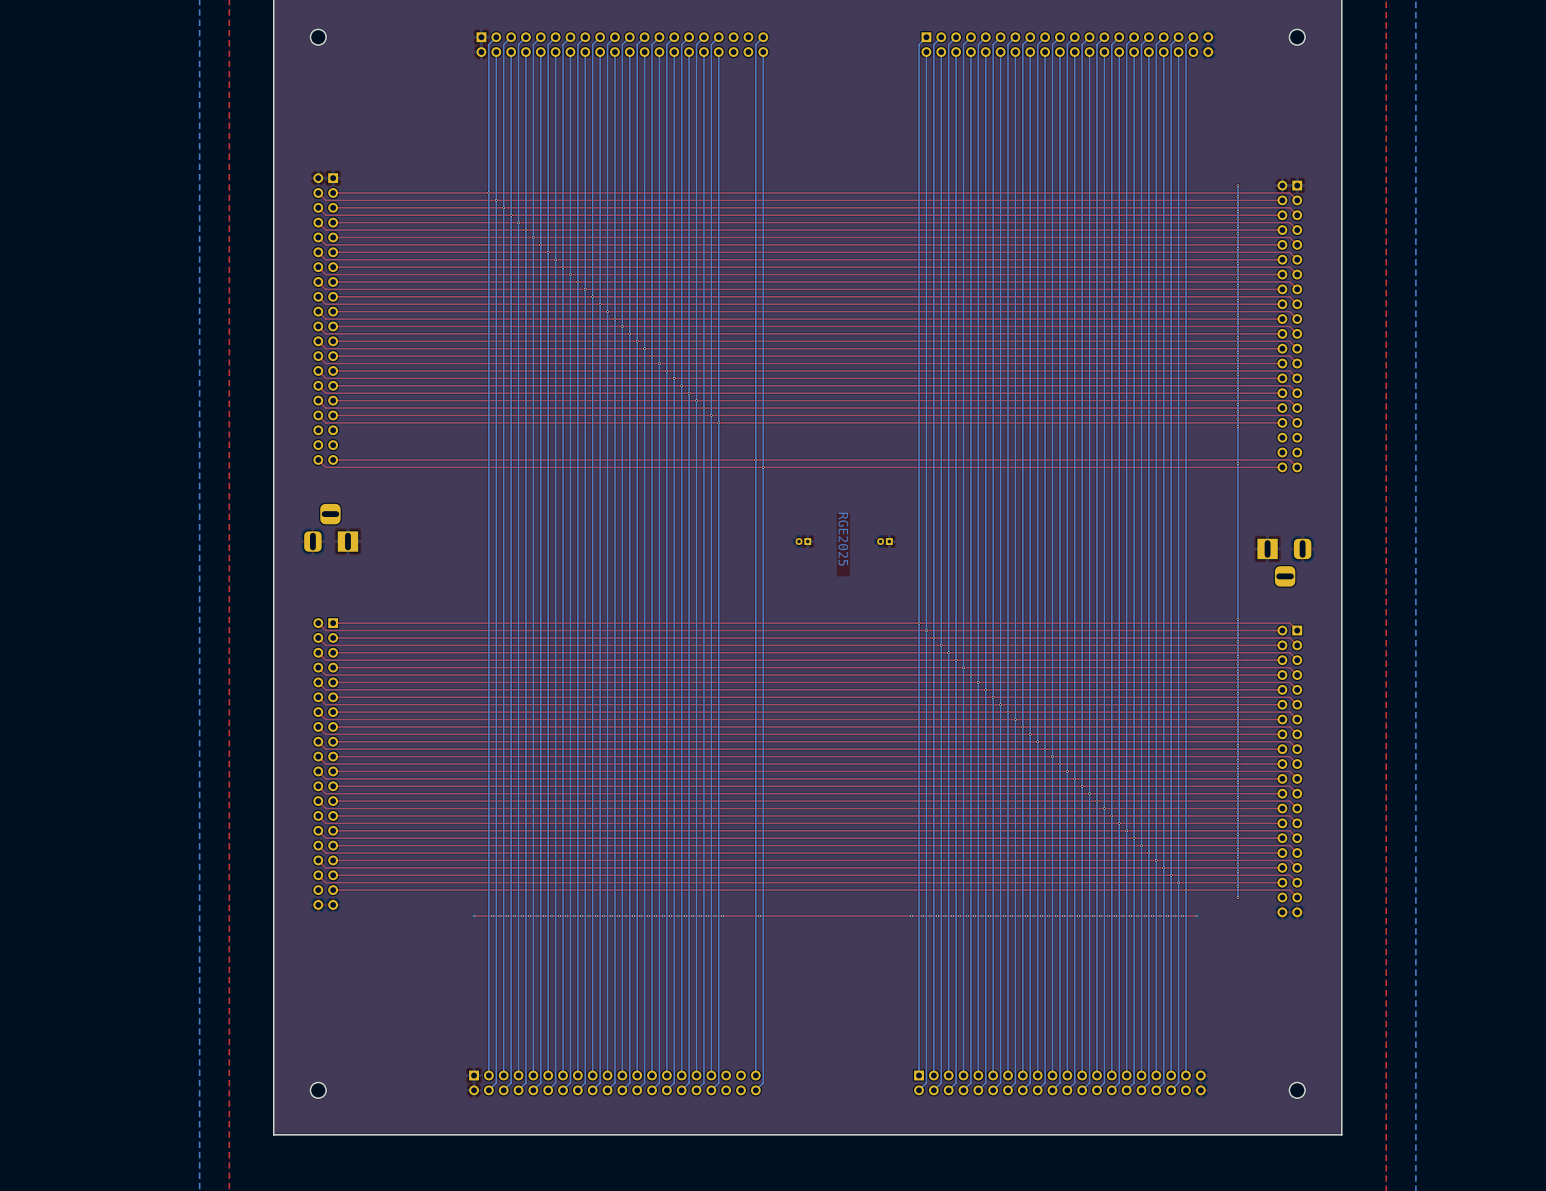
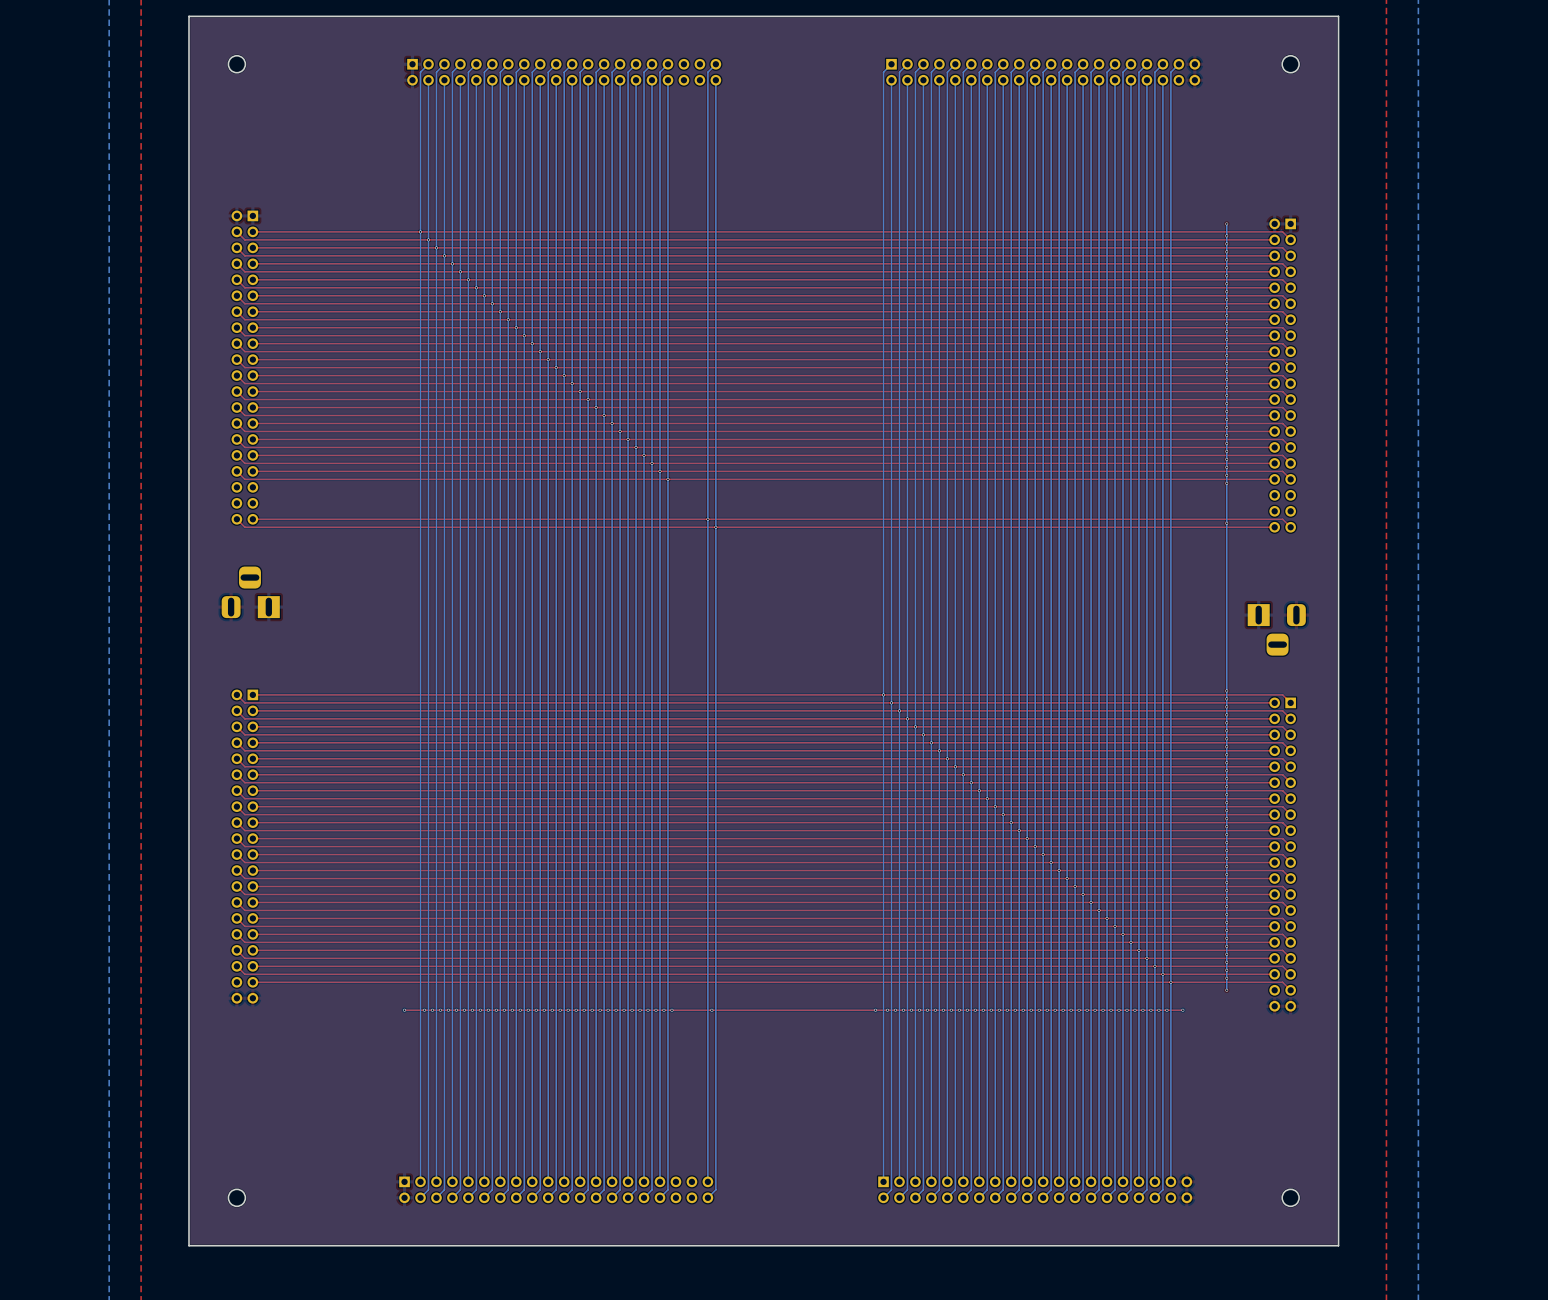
text: RGE2025 (843, 539) -> none
part: (803, 541) -> none
part: (884, 541) -> none

